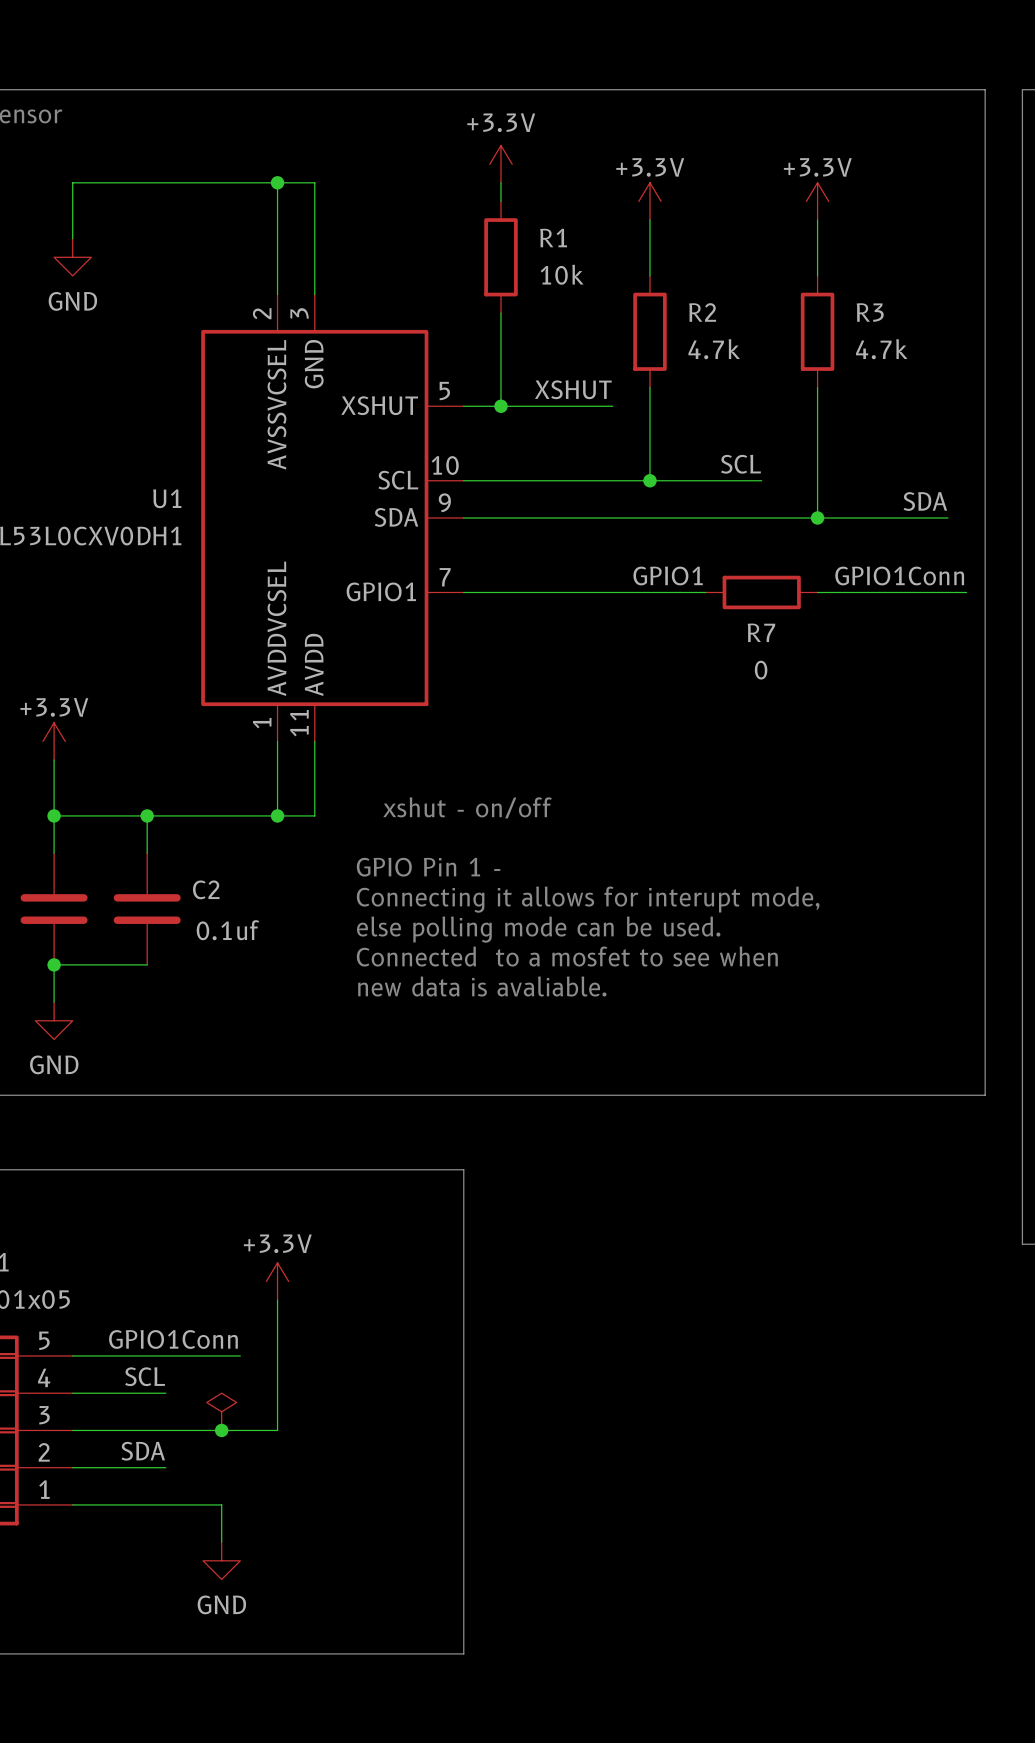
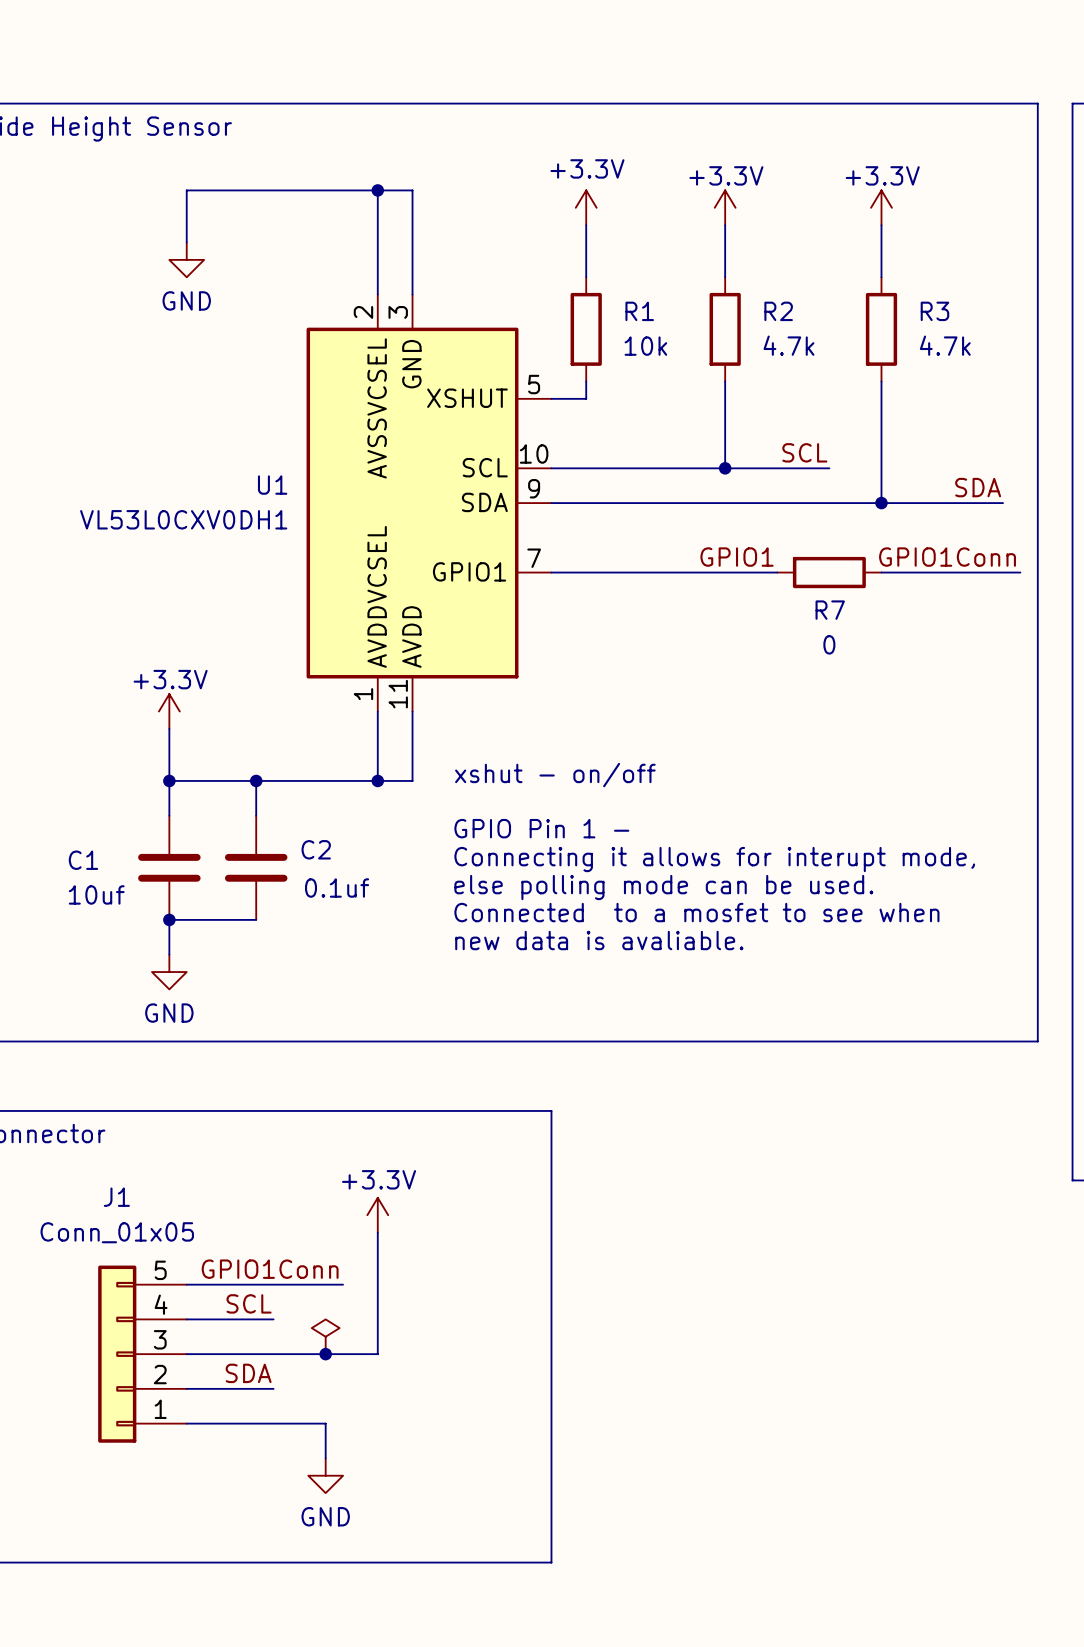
power symbol position: +3.3V (501, 164) -> +3.3V (586, 207)
wire: none -> (586, 225) (586, 277)
R1 position: (501, 257) -> (586, 329)
wire: (501, 313) (501, 387) -> none
label: XSHUT (573, 389) -> none
wire: (501, 406) (612, 406) -> none
junction: (501, 406) -> none

